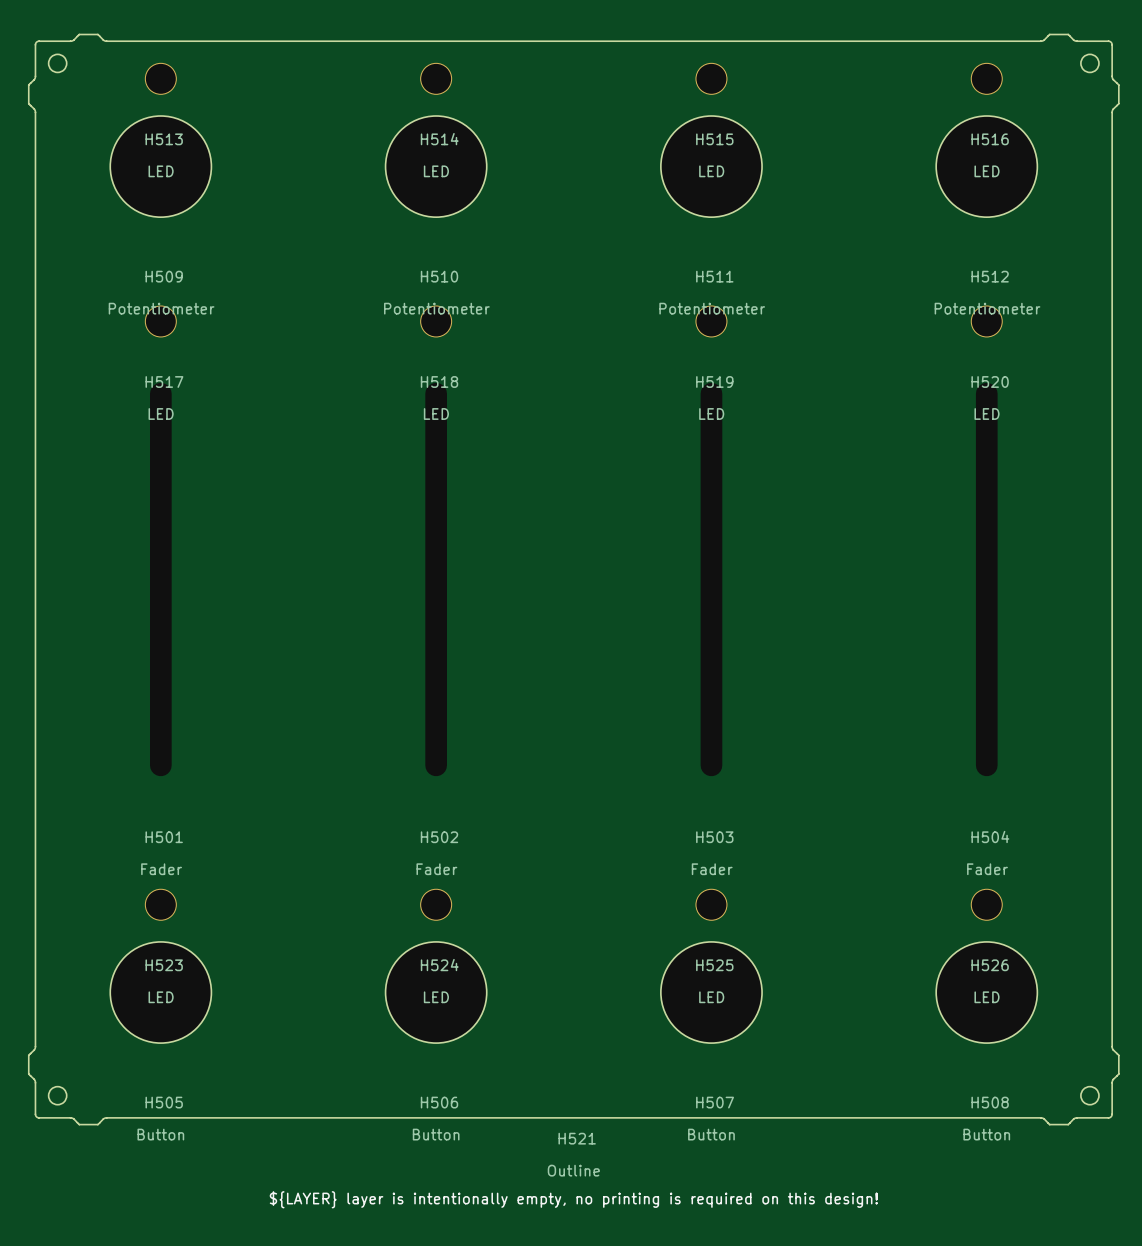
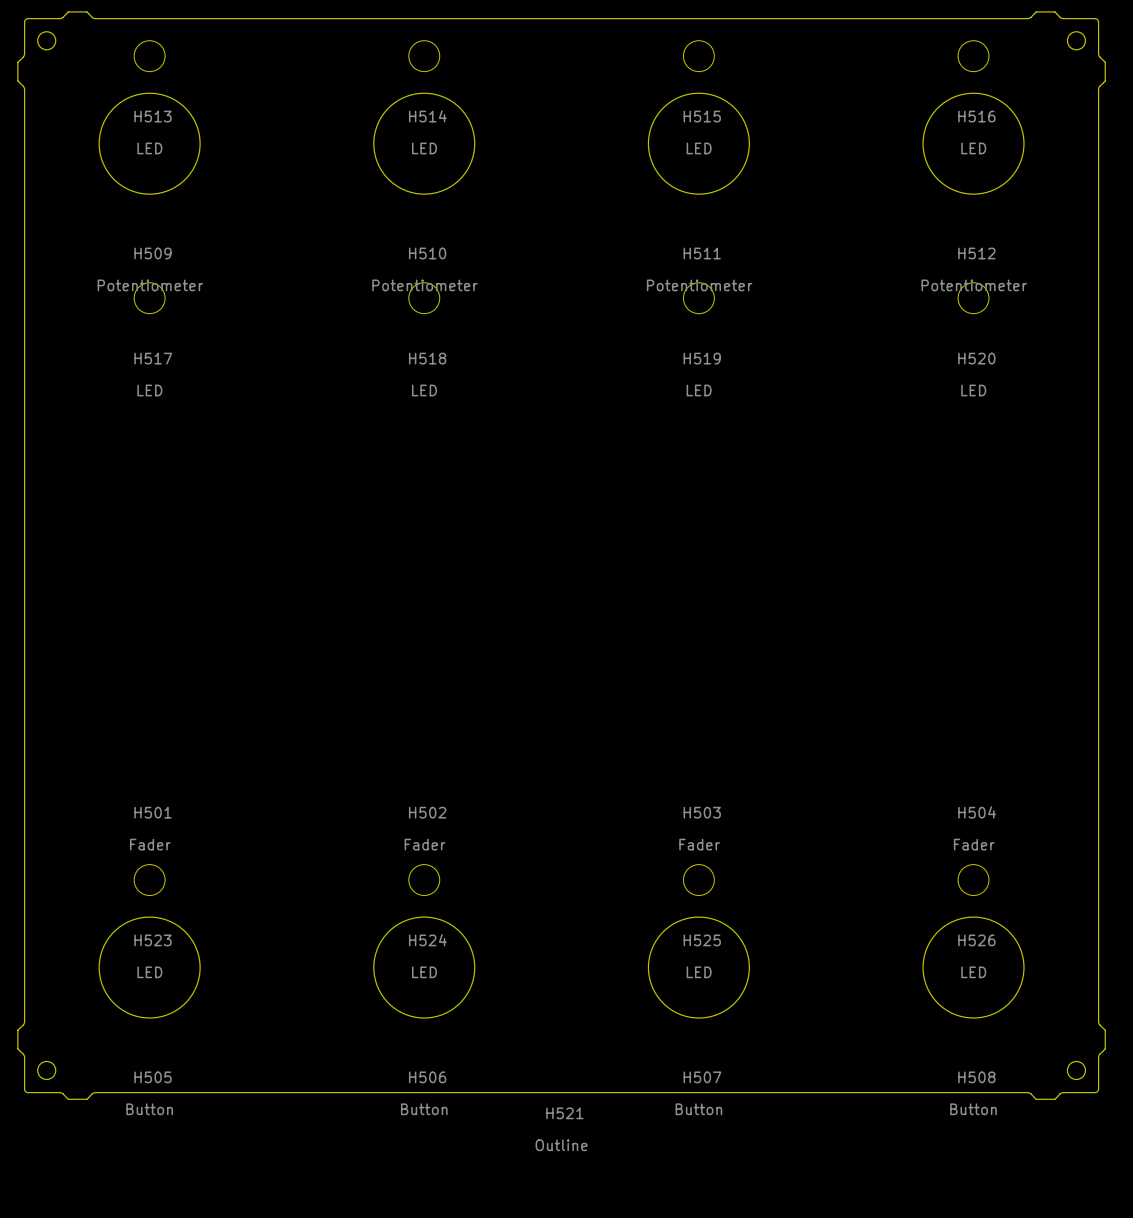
text: ${LAYER} layer is intentionally empty, no printing is required on this design! (573, 1199) -> none

